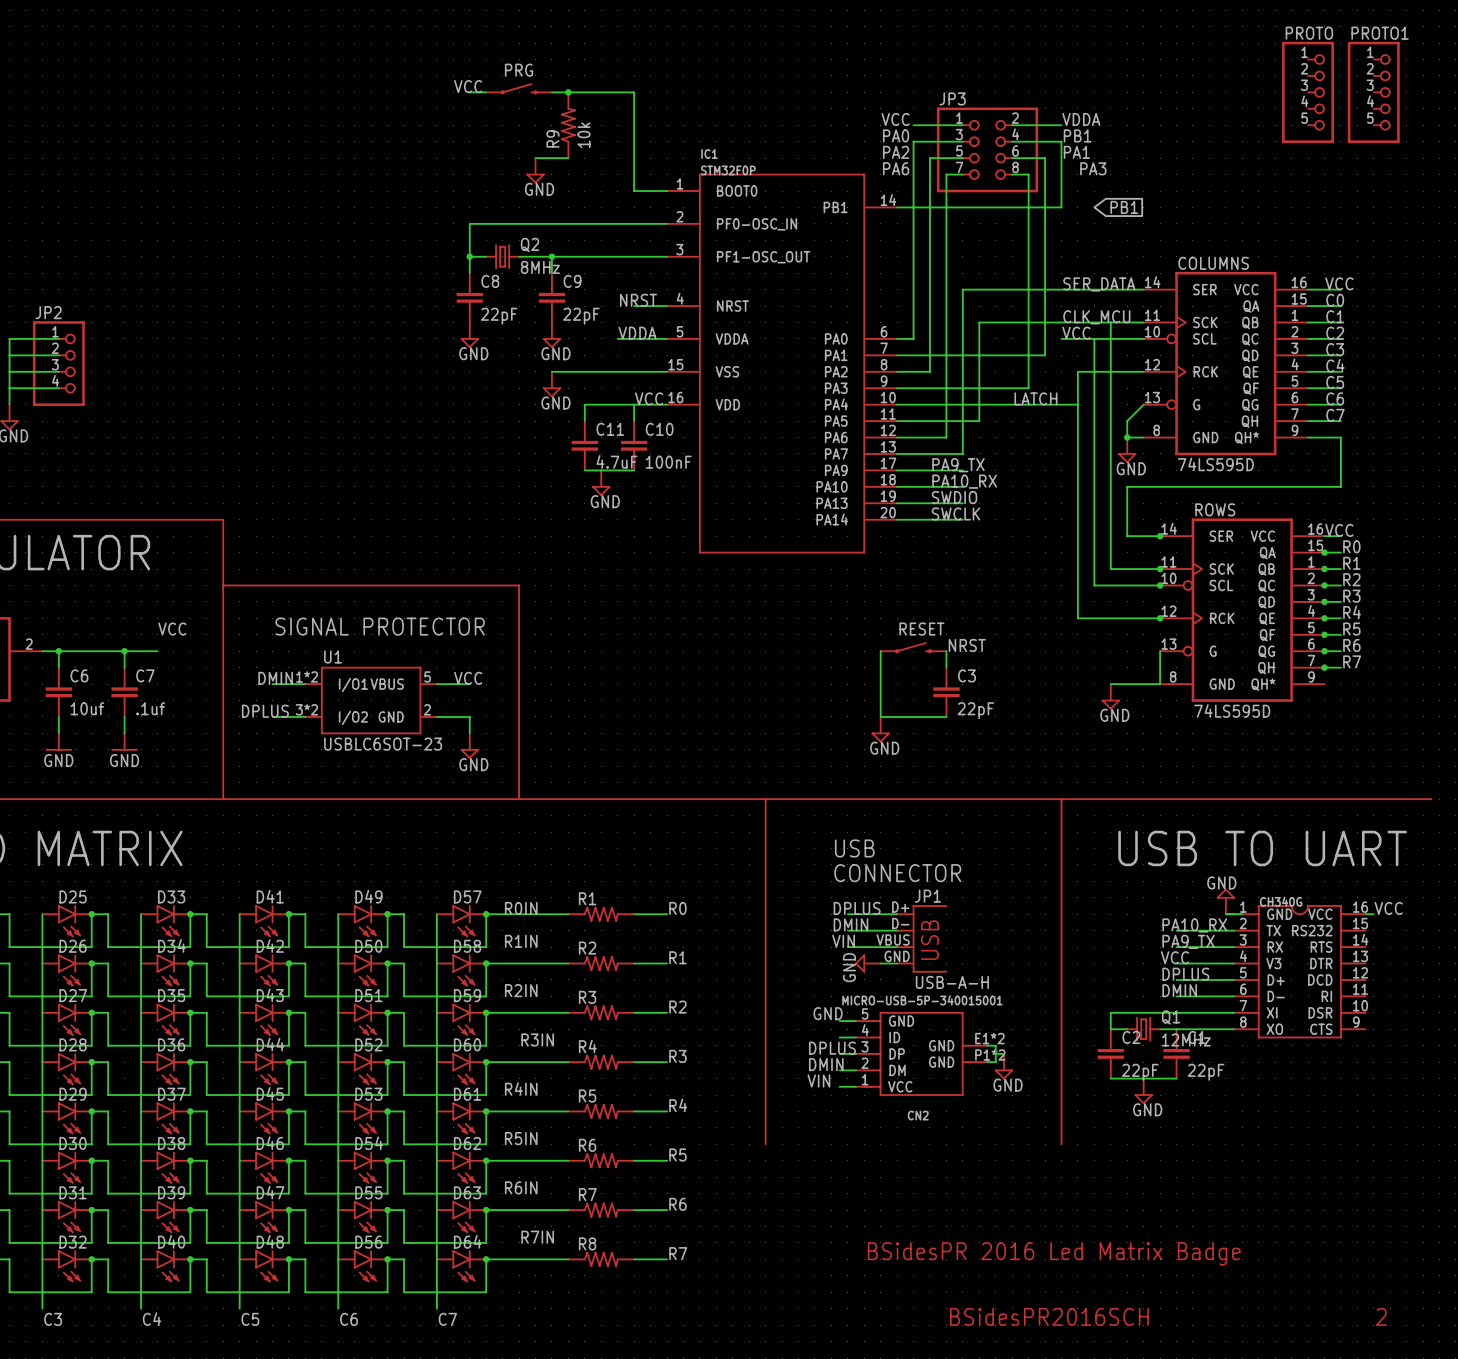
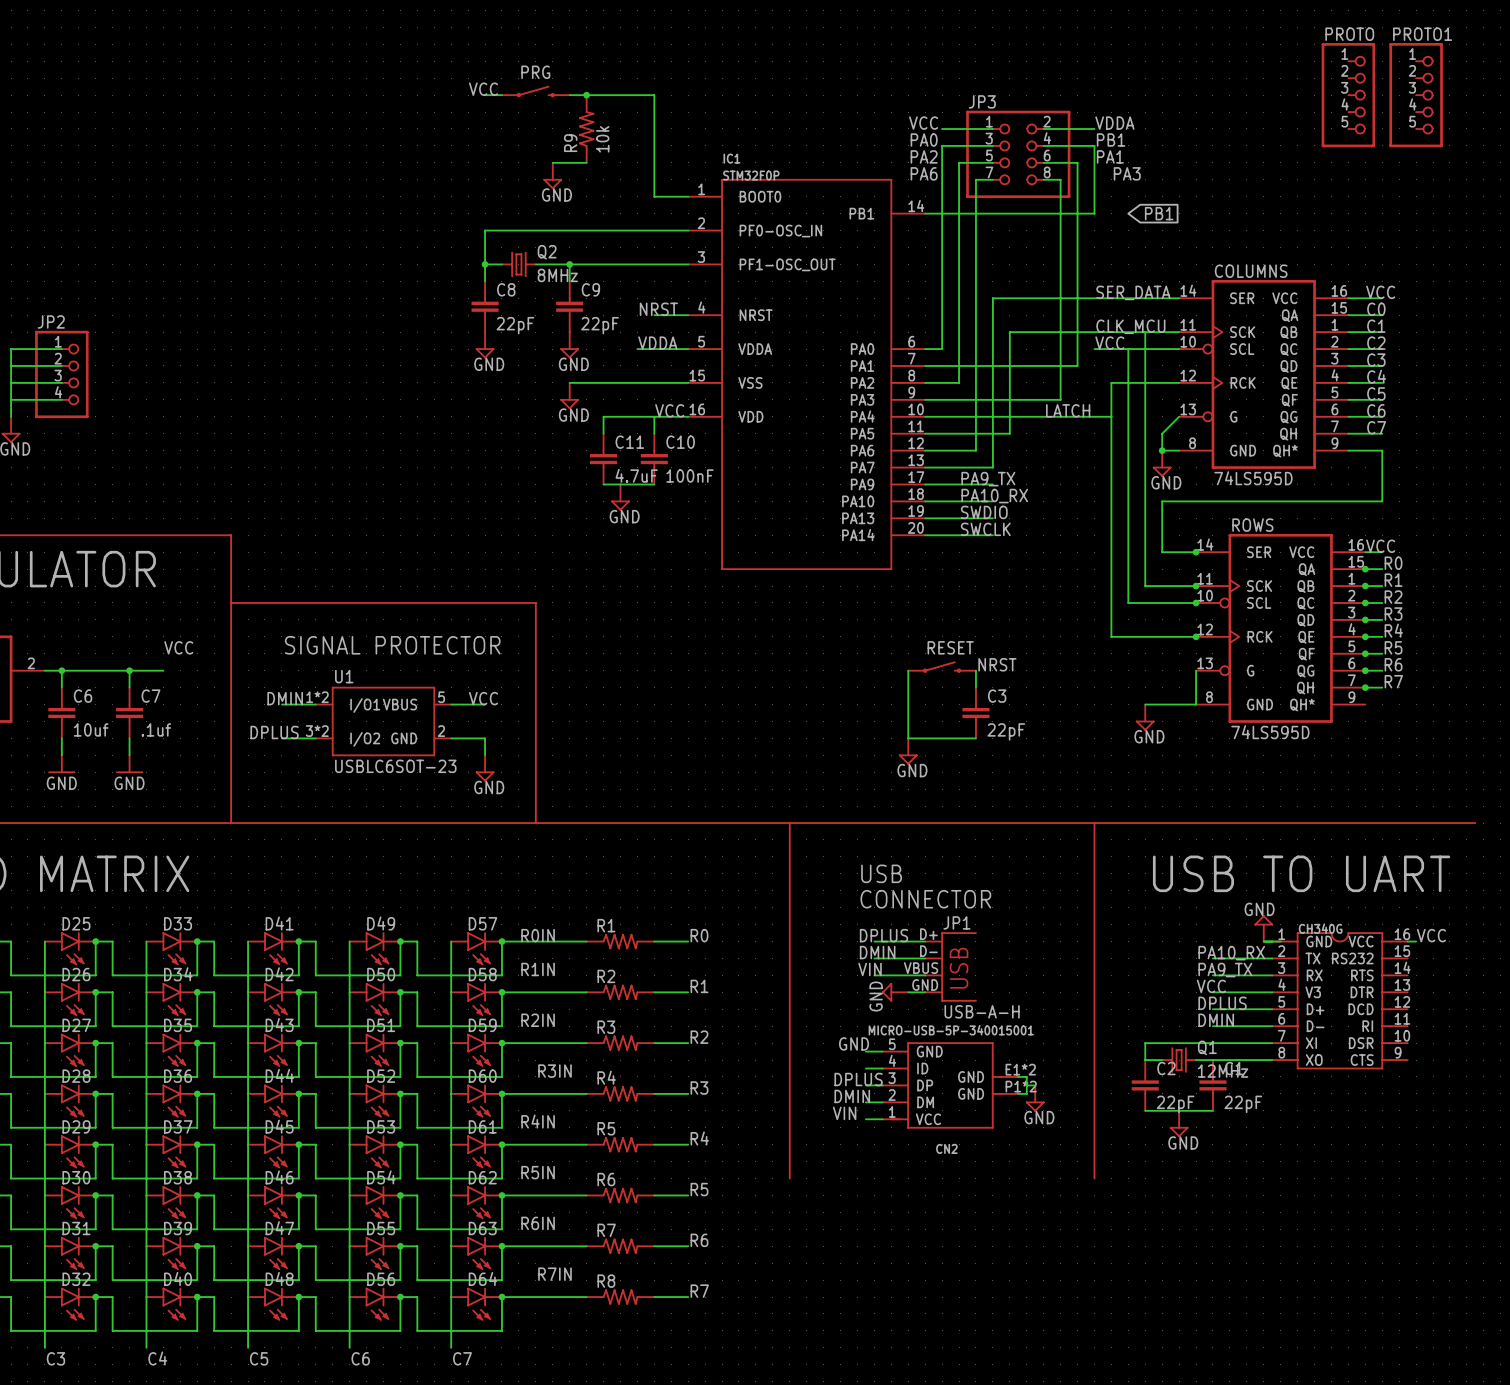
text: BSidesPR 2016 Led Matrix Badge (1054, 1253) -> none
text: BSidesPR2016SCH (1049, 1316) -> none
text: 2 (1381, 1316) -> none

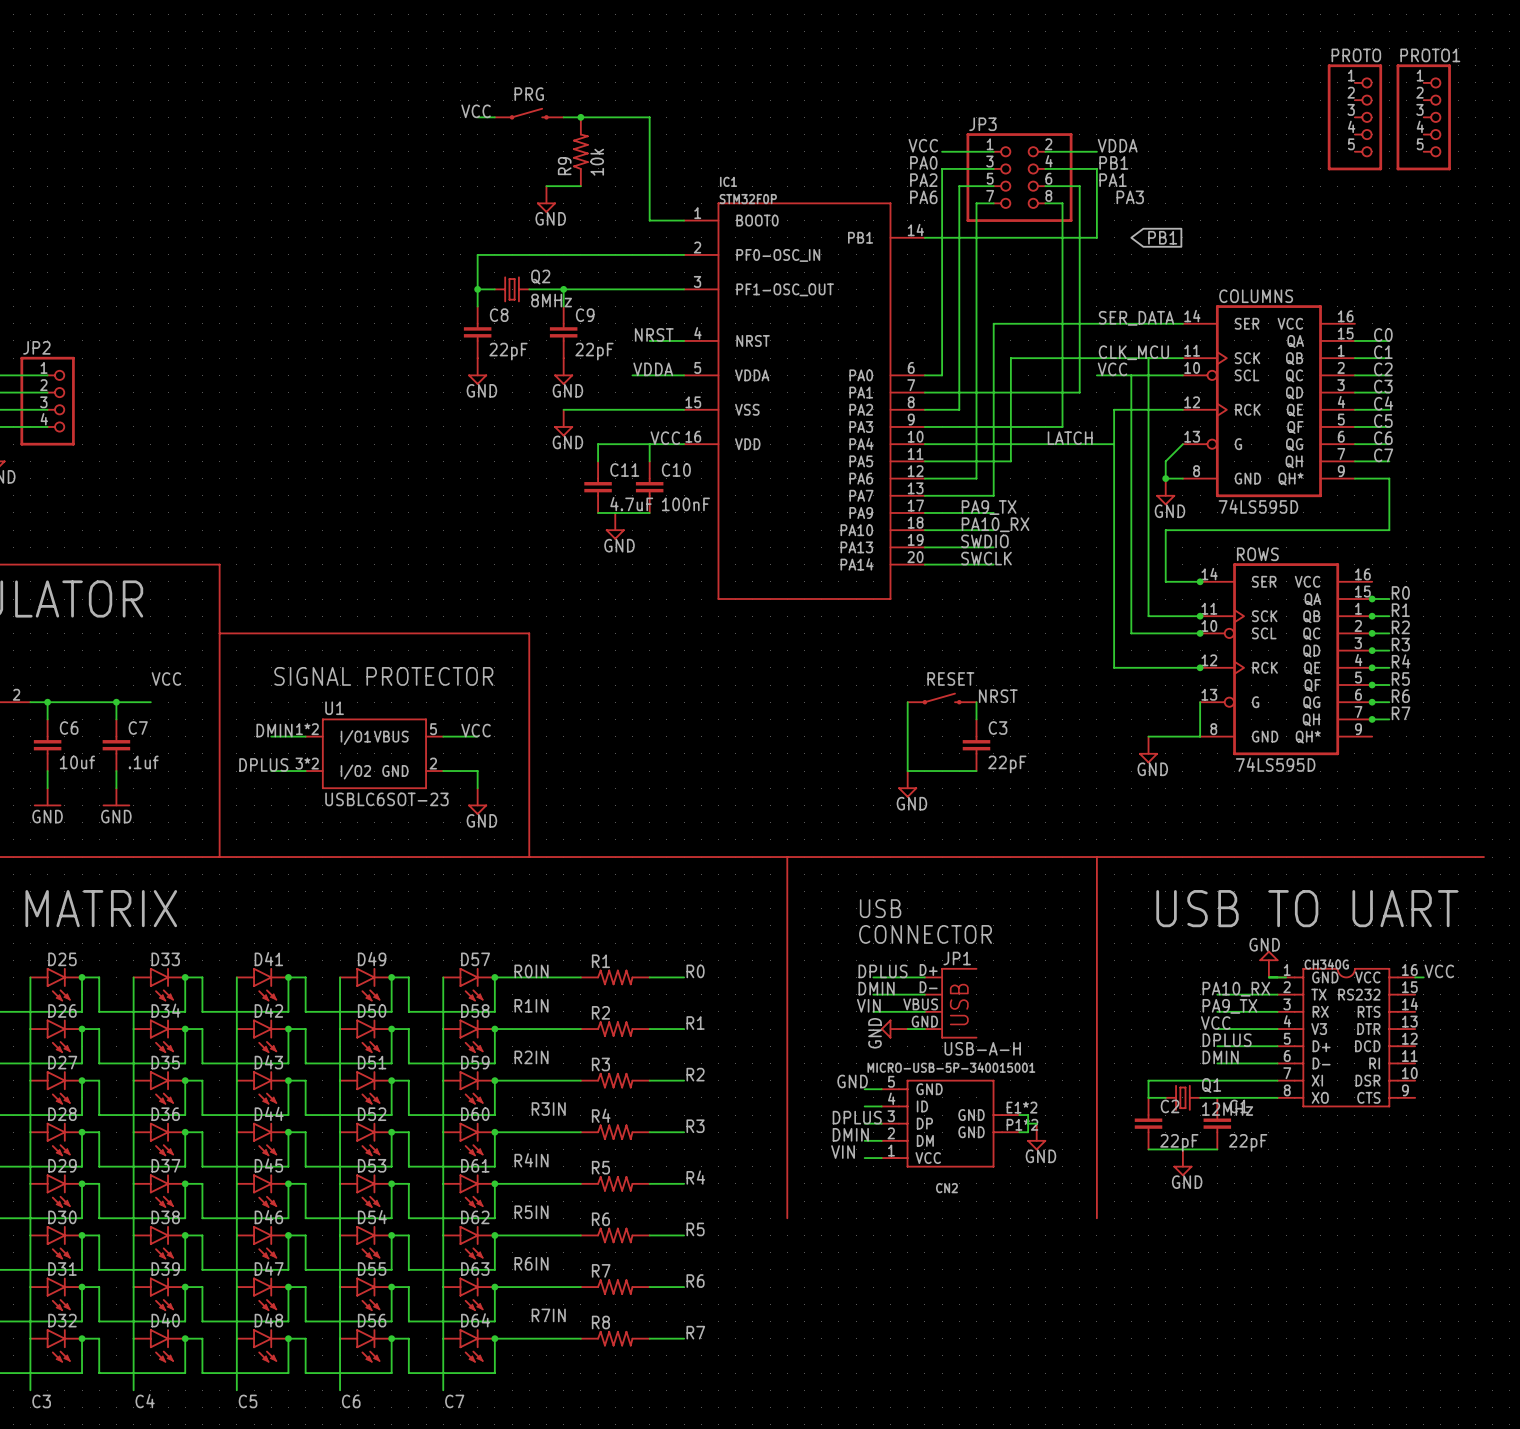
label: VCC (1380, 292) -> none
wire: (1348, 298) (1382, 298) -> none
label: VCC (1380, 546) -> none
wire: (1365, 552) (1382, 552) -> none

